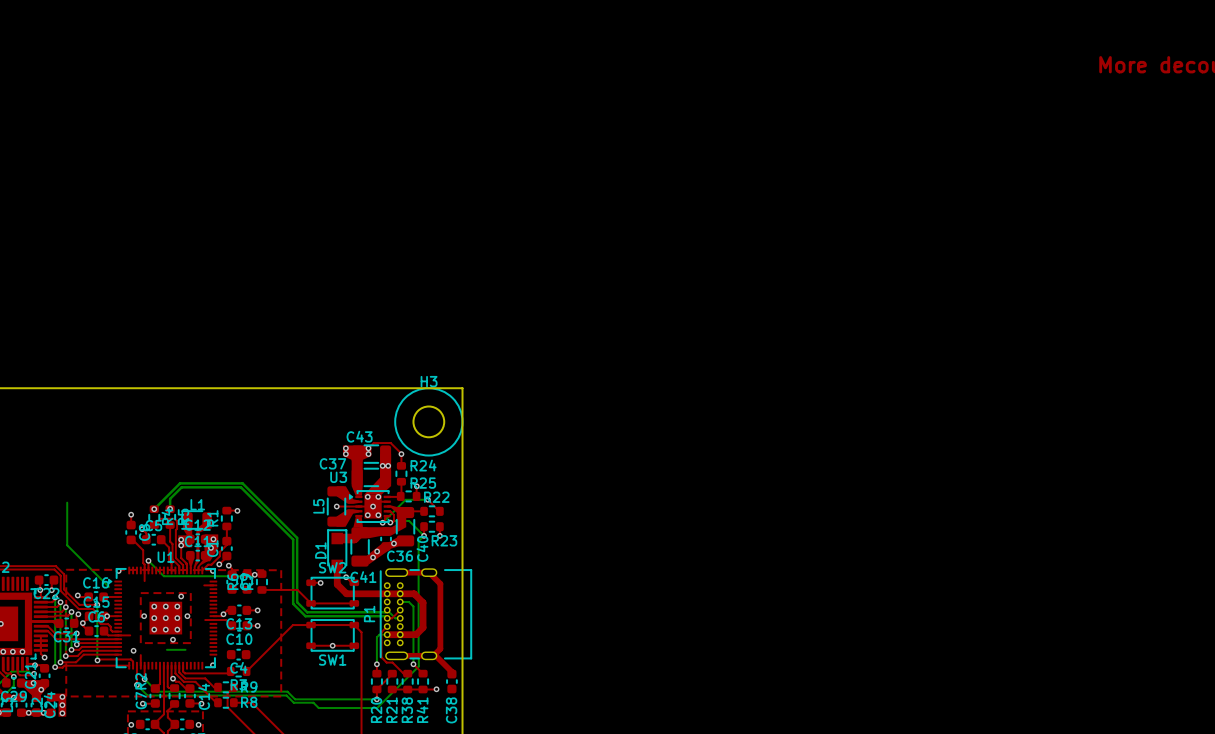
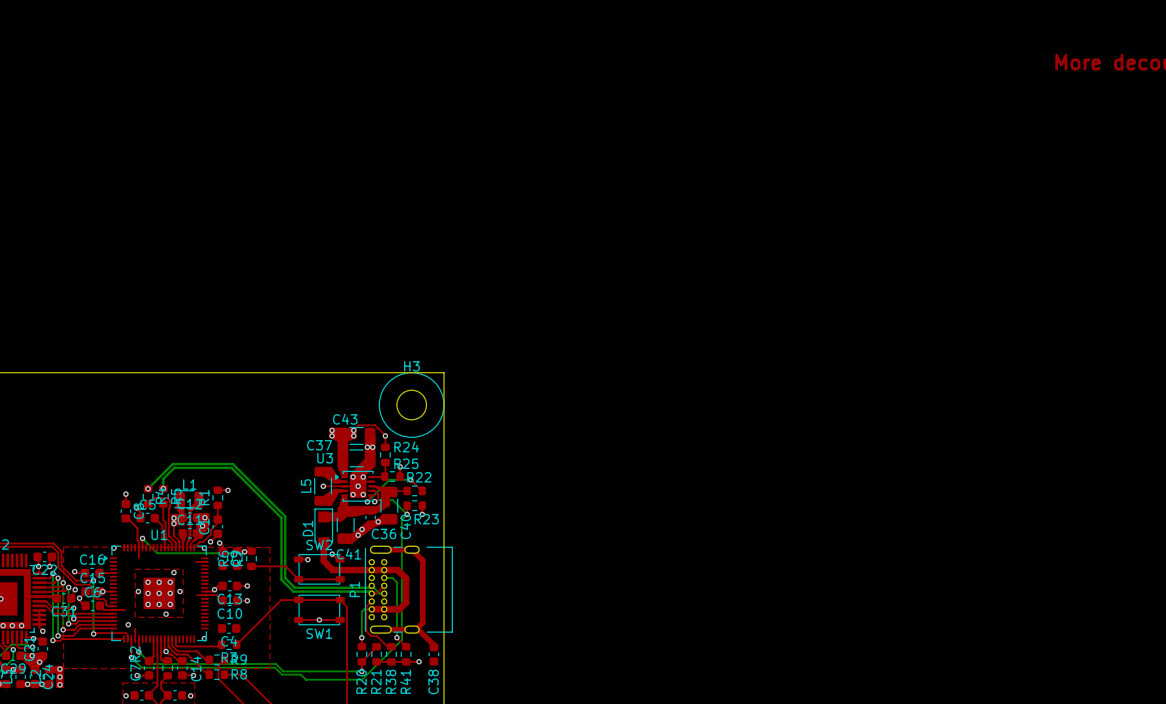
bottom track: (67, 502) (67, 545) (108, 586) -> none
bottom track: (166, 649) (185, 649) -> none

